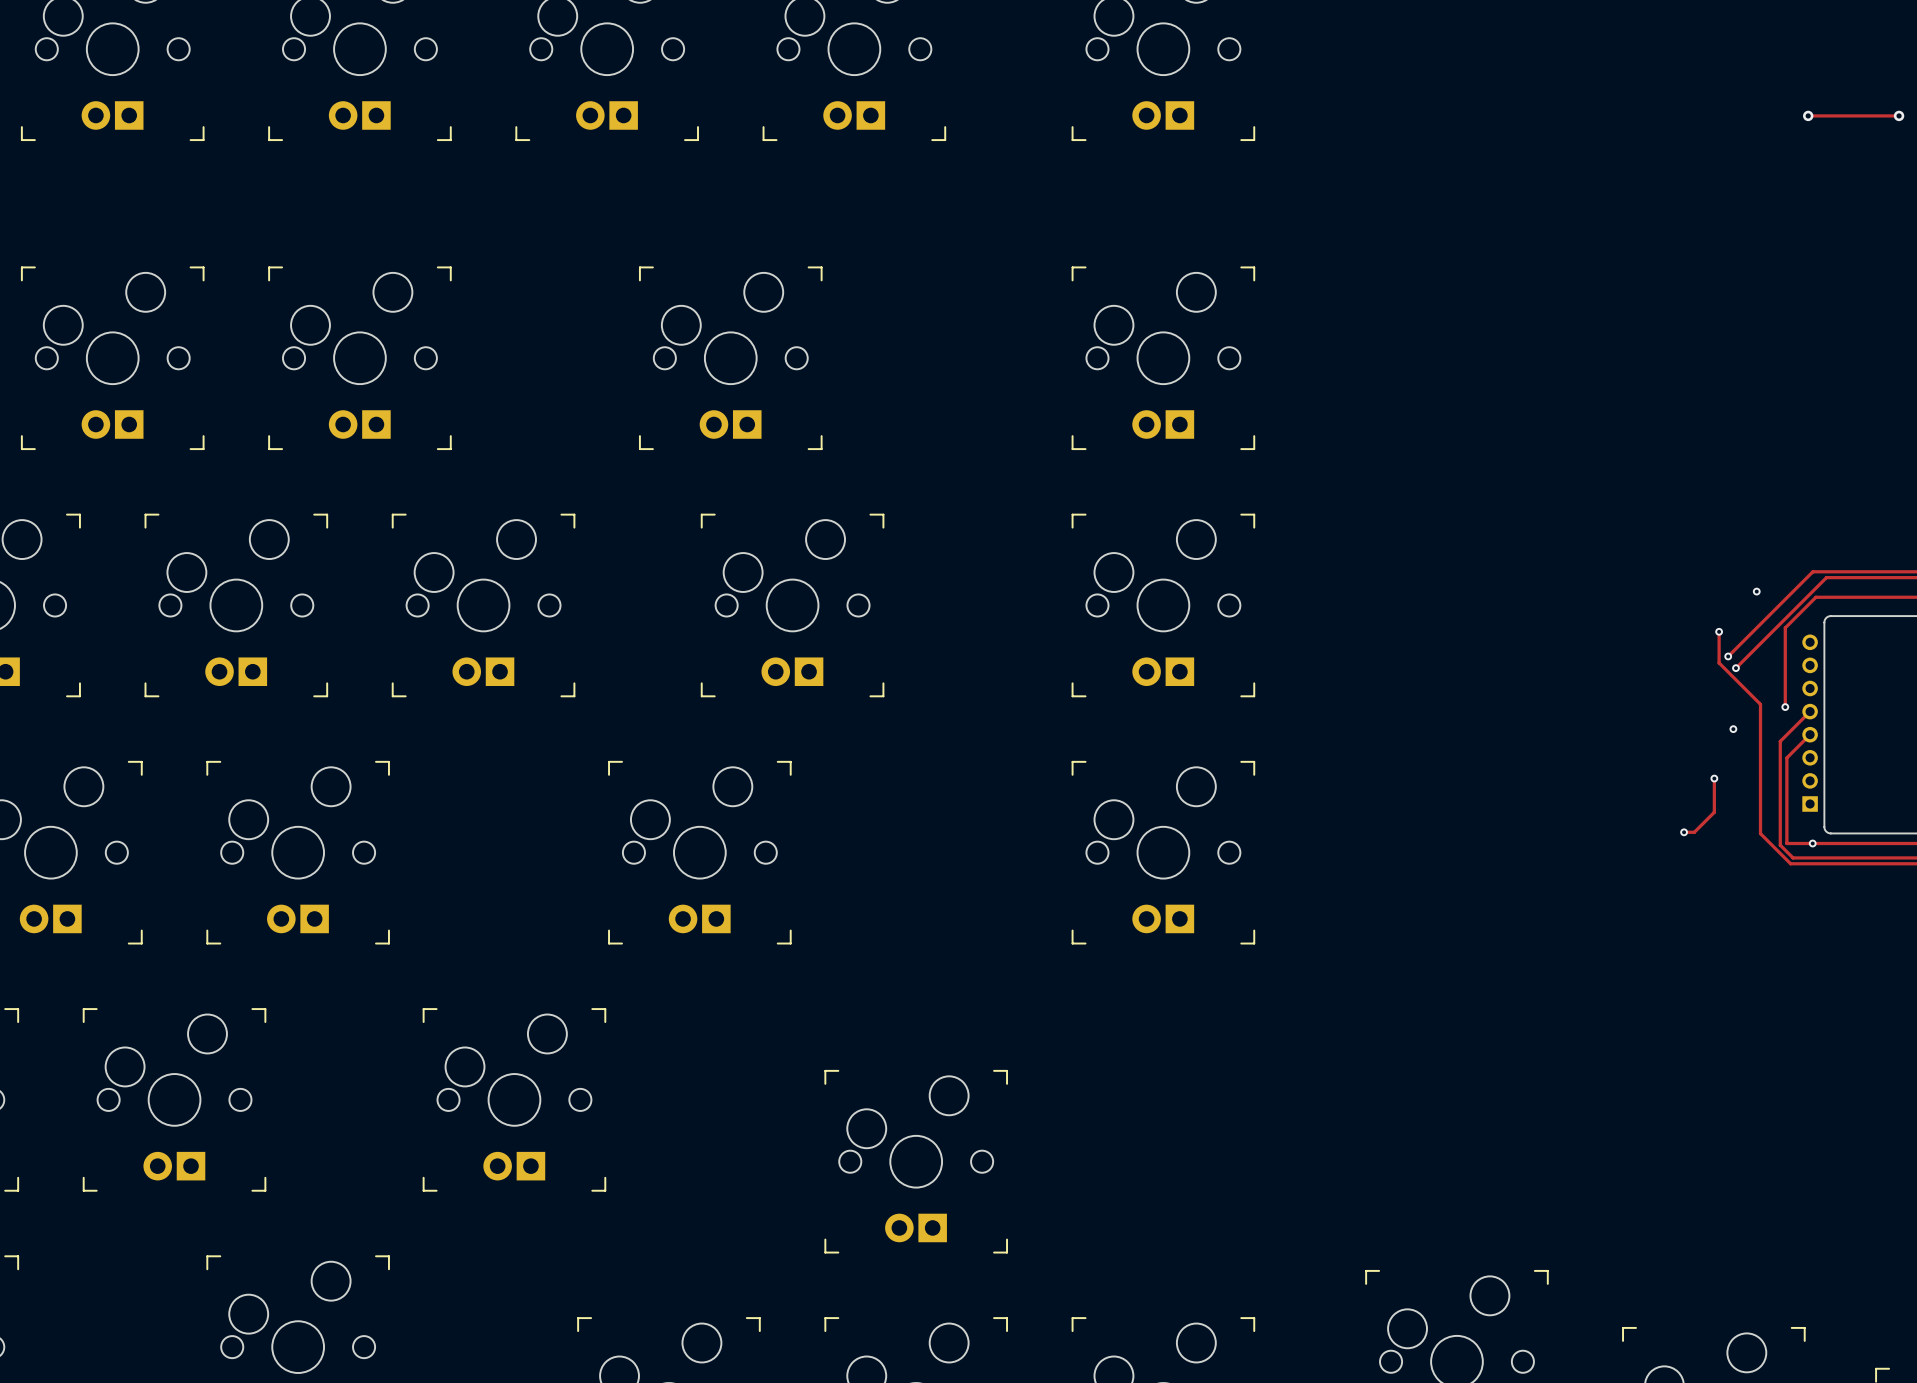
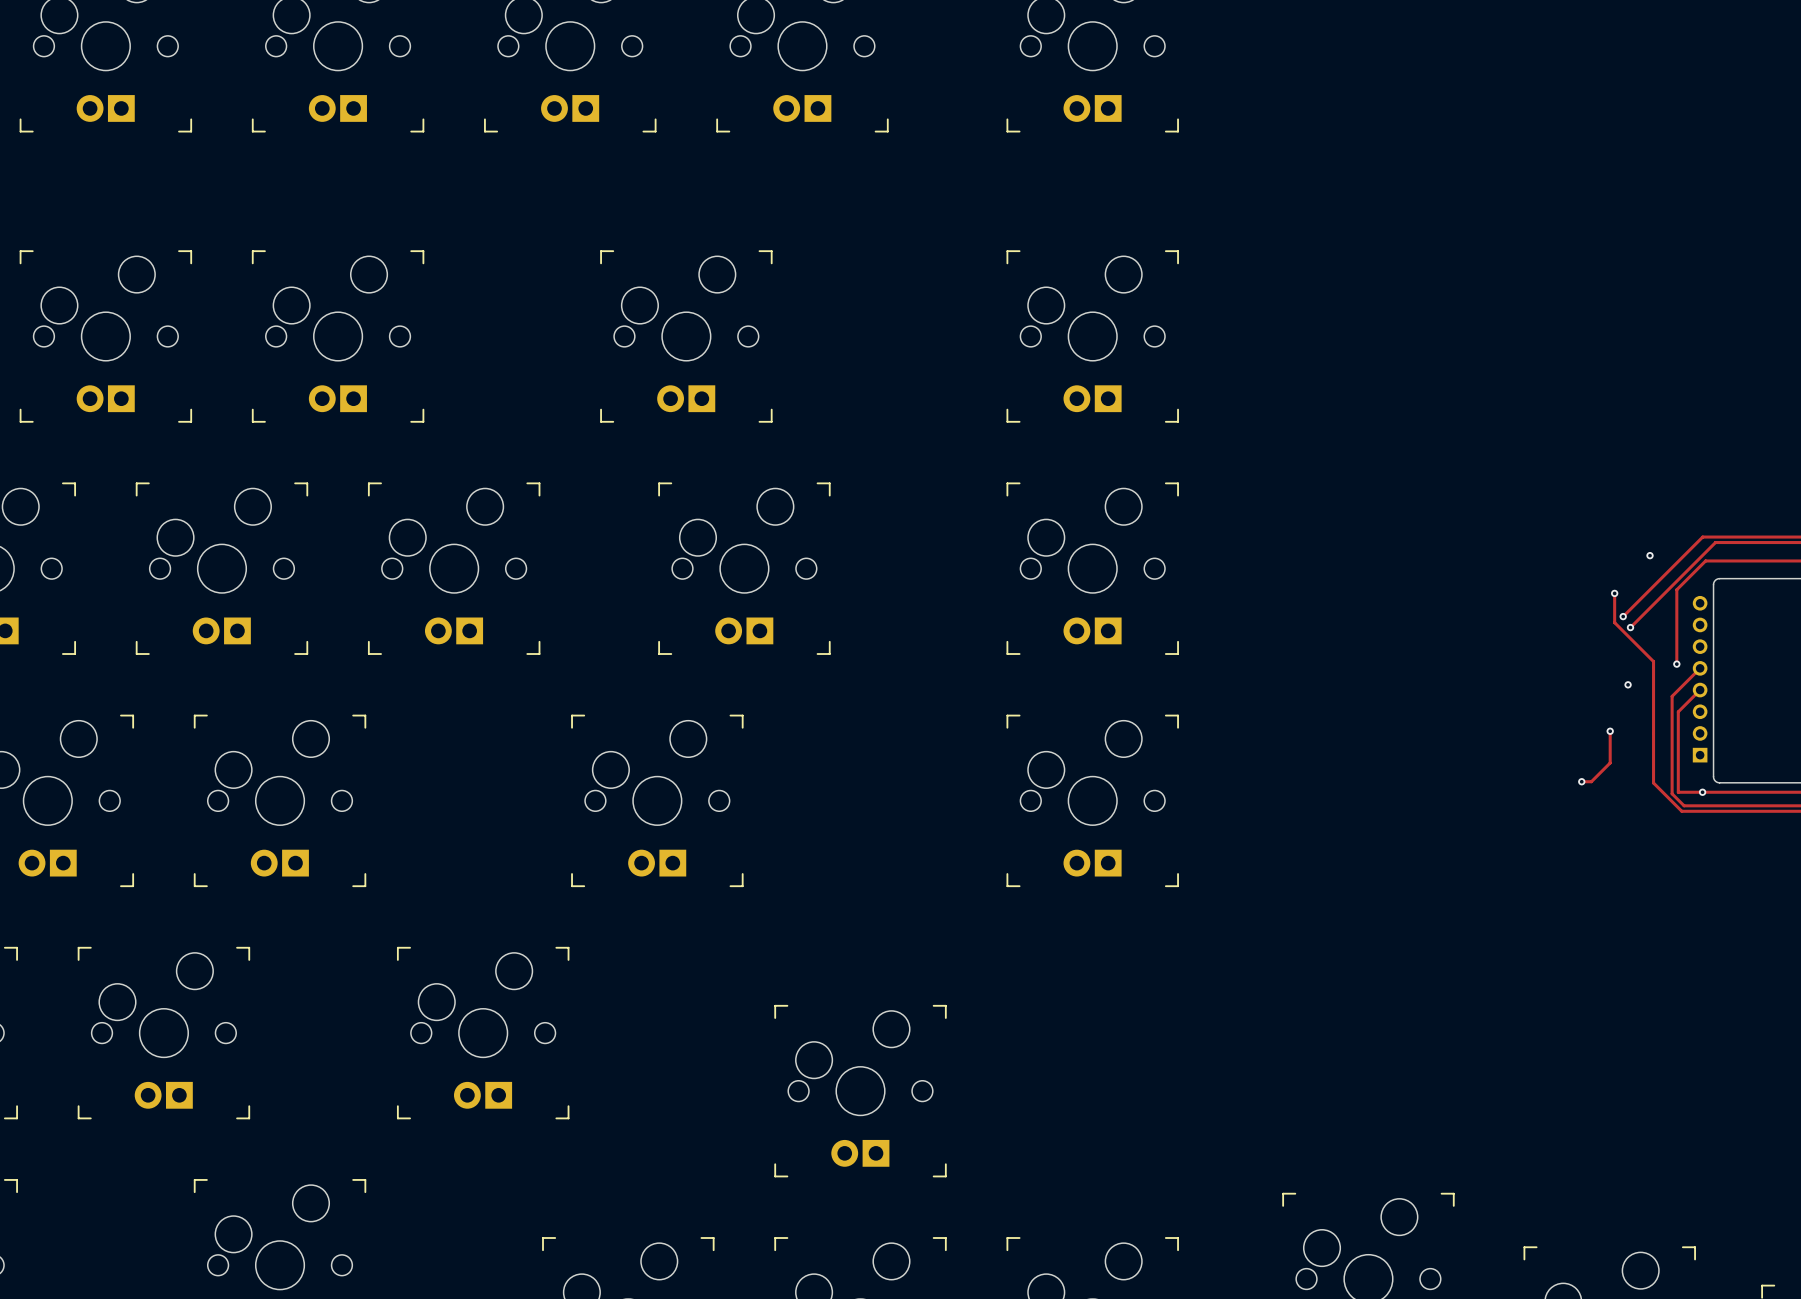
track: (1808, 115) (1899, 115) -> none
via: (1808, 115) -> none
via: (1899, 115) -> none

